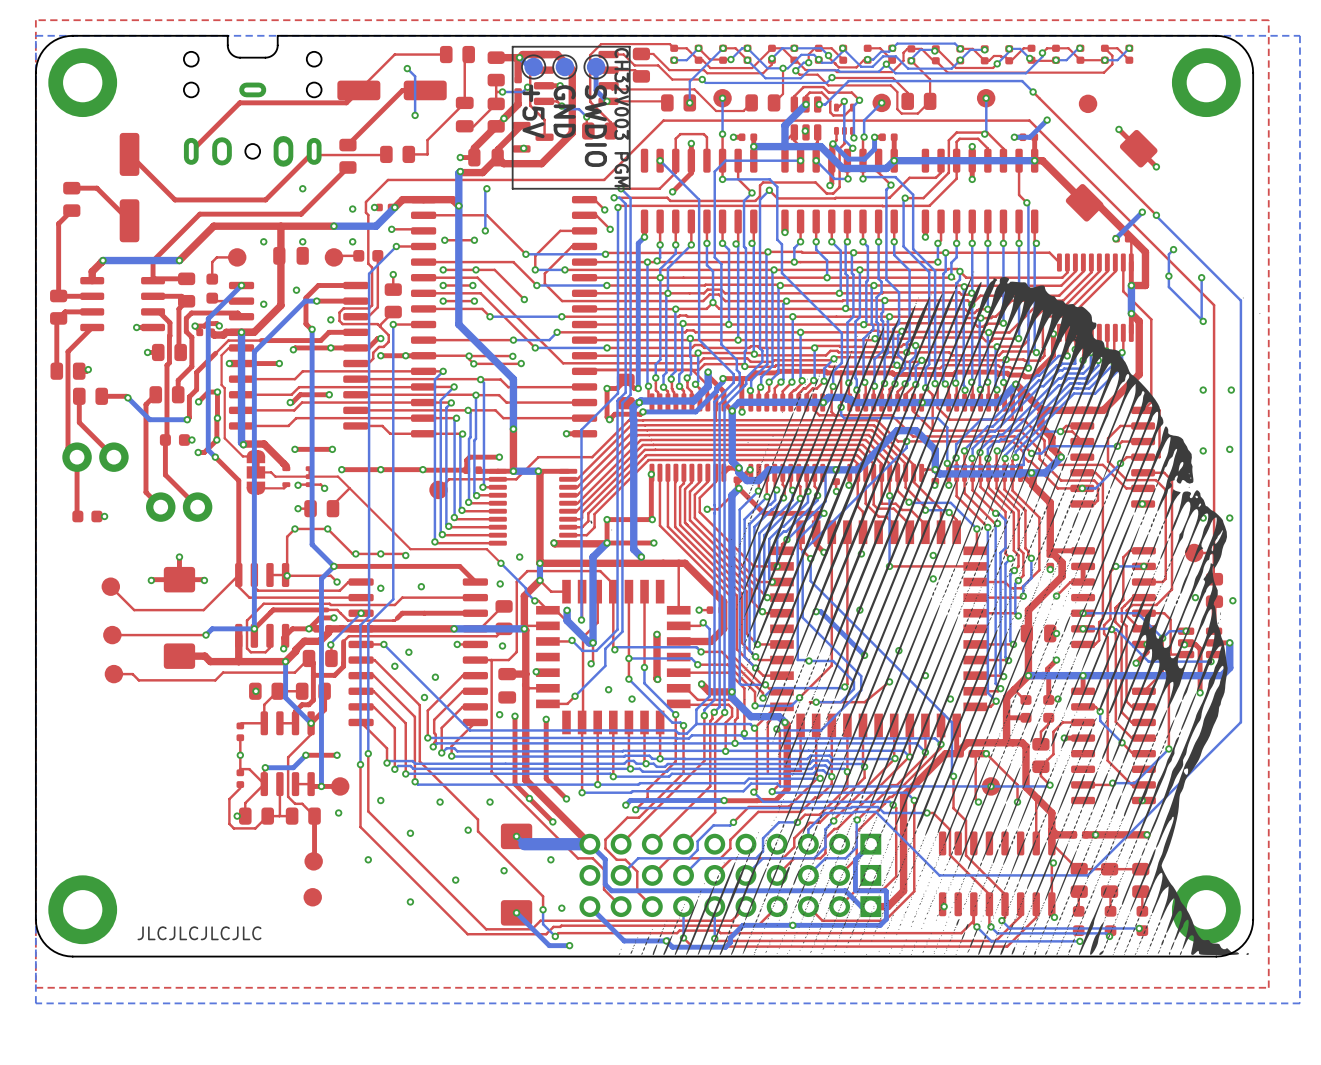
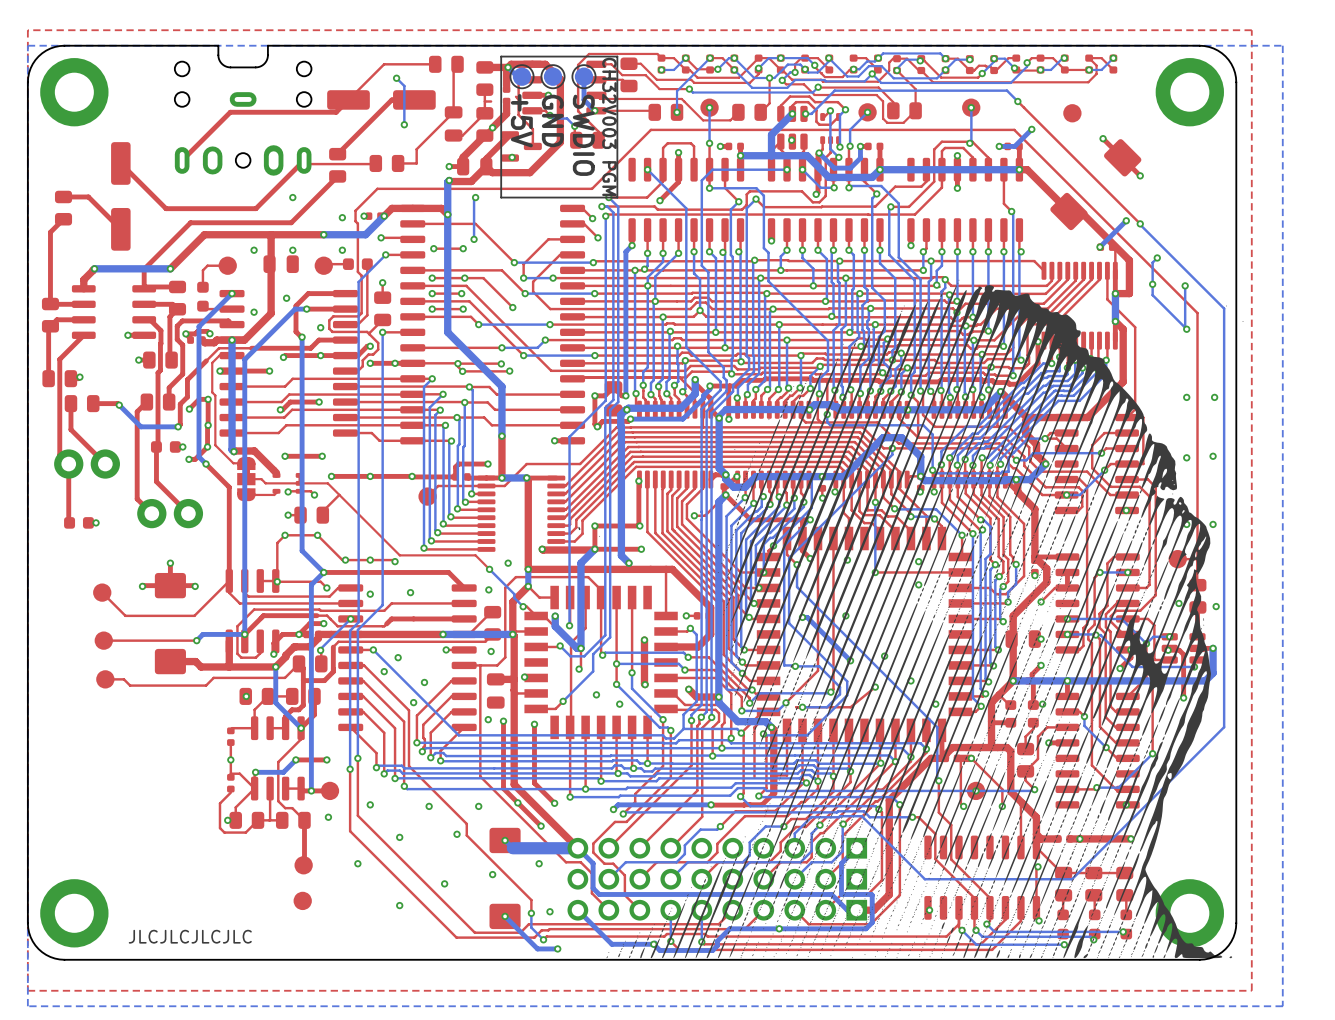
bottom track: (527, 87) (522, 91) (502, 91) -> none
via: (527, 87) -> none
via: (502, 91) -> none

